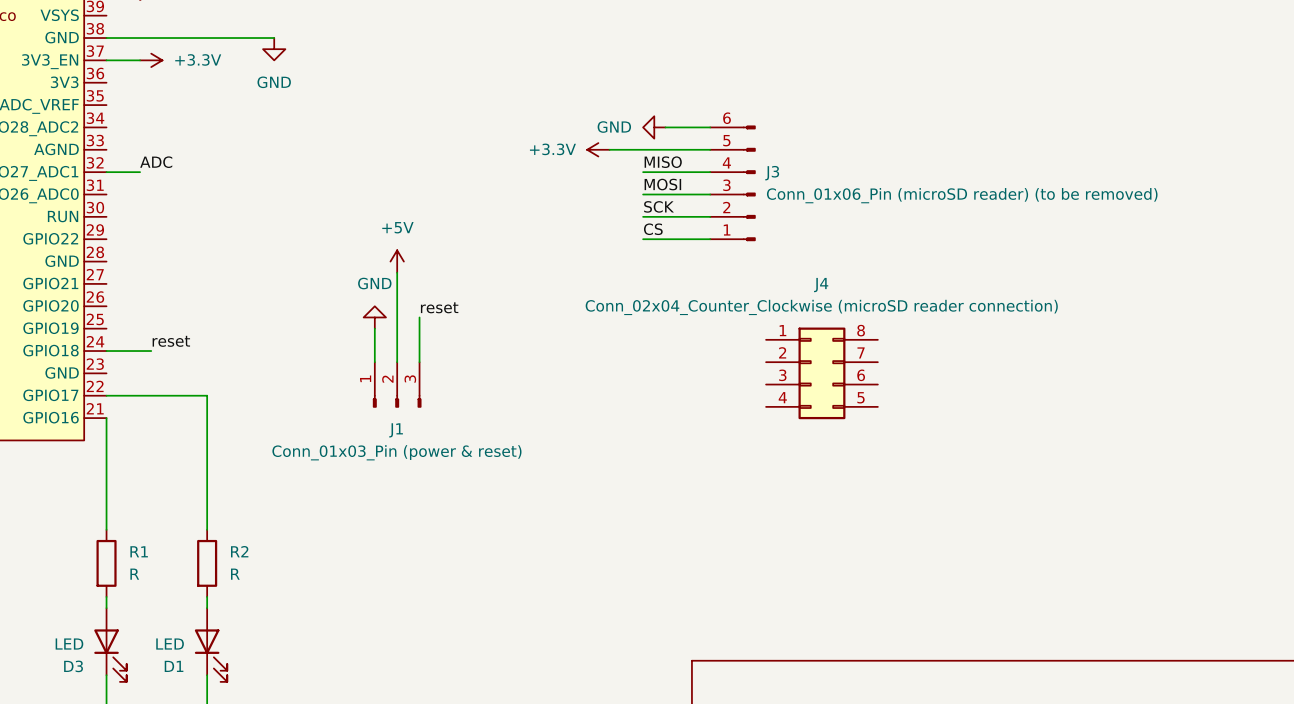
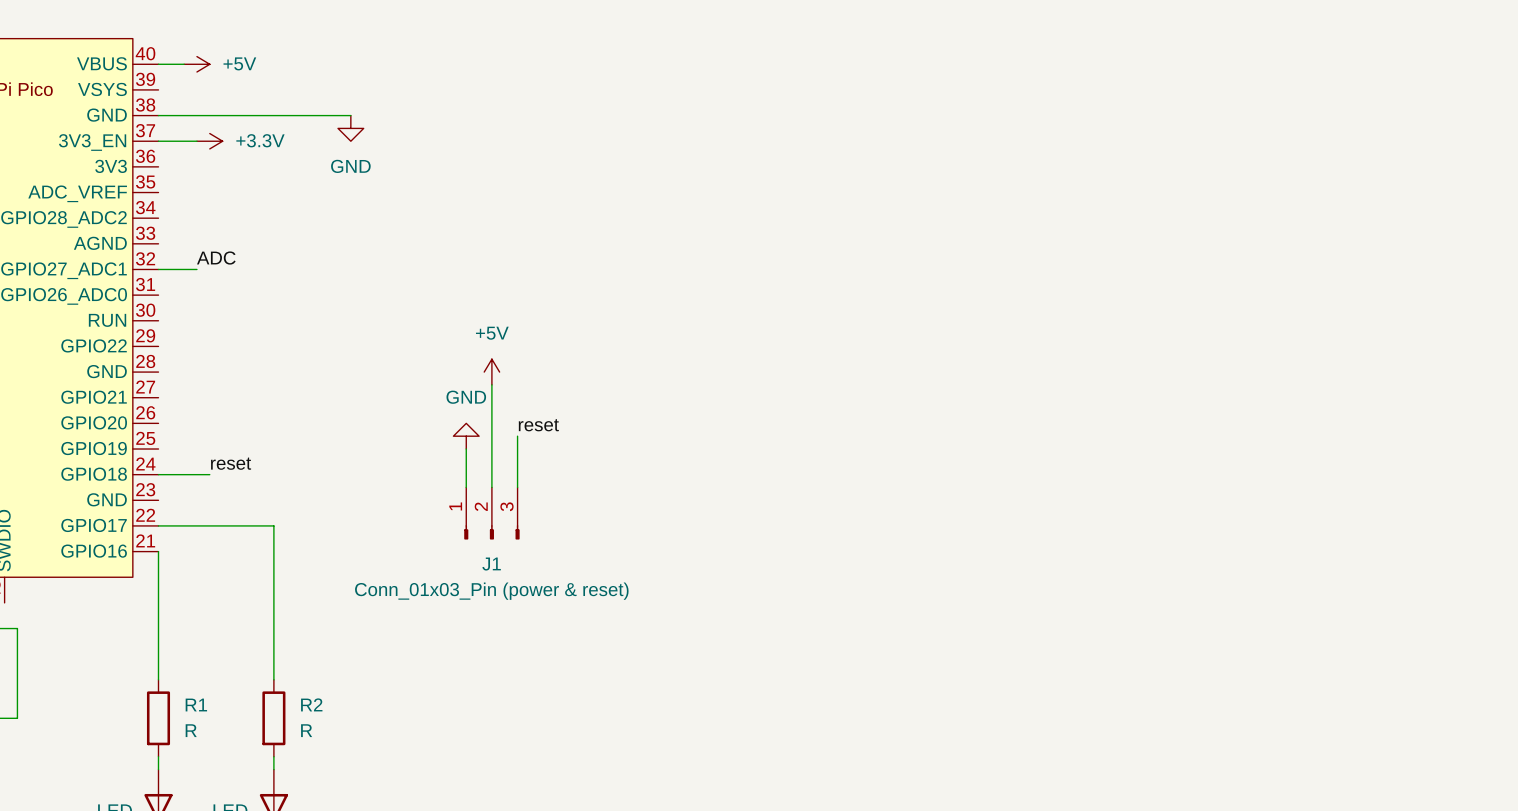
power symbol: GND (654, 127) -> none
wire: (665, 127) (710, 127) -> none
power symbol: +3.3V (598, 149) -> none
wire: (609, 149) (710, 149) -> none
label: MISO (663, 162) -> none
wire: (643, 172) (710, 172) -> none
J3: Conn_01x06_Pin (microSD reader) (to be removed) (732, 183) -> none
label: MOSI (662, 184) -> none
wire: (643, 194) (710, 194) -> none
label: SCK (659, 206) -> none
wire: (643, 216) (710, 216) -> none
label: CS (653, 229) -> none
wire: (643, 239) (710, 239) -> none
J4: Conn_02x04_Counter_Clockwise (microSD reader connection) (821, 373) -> none

